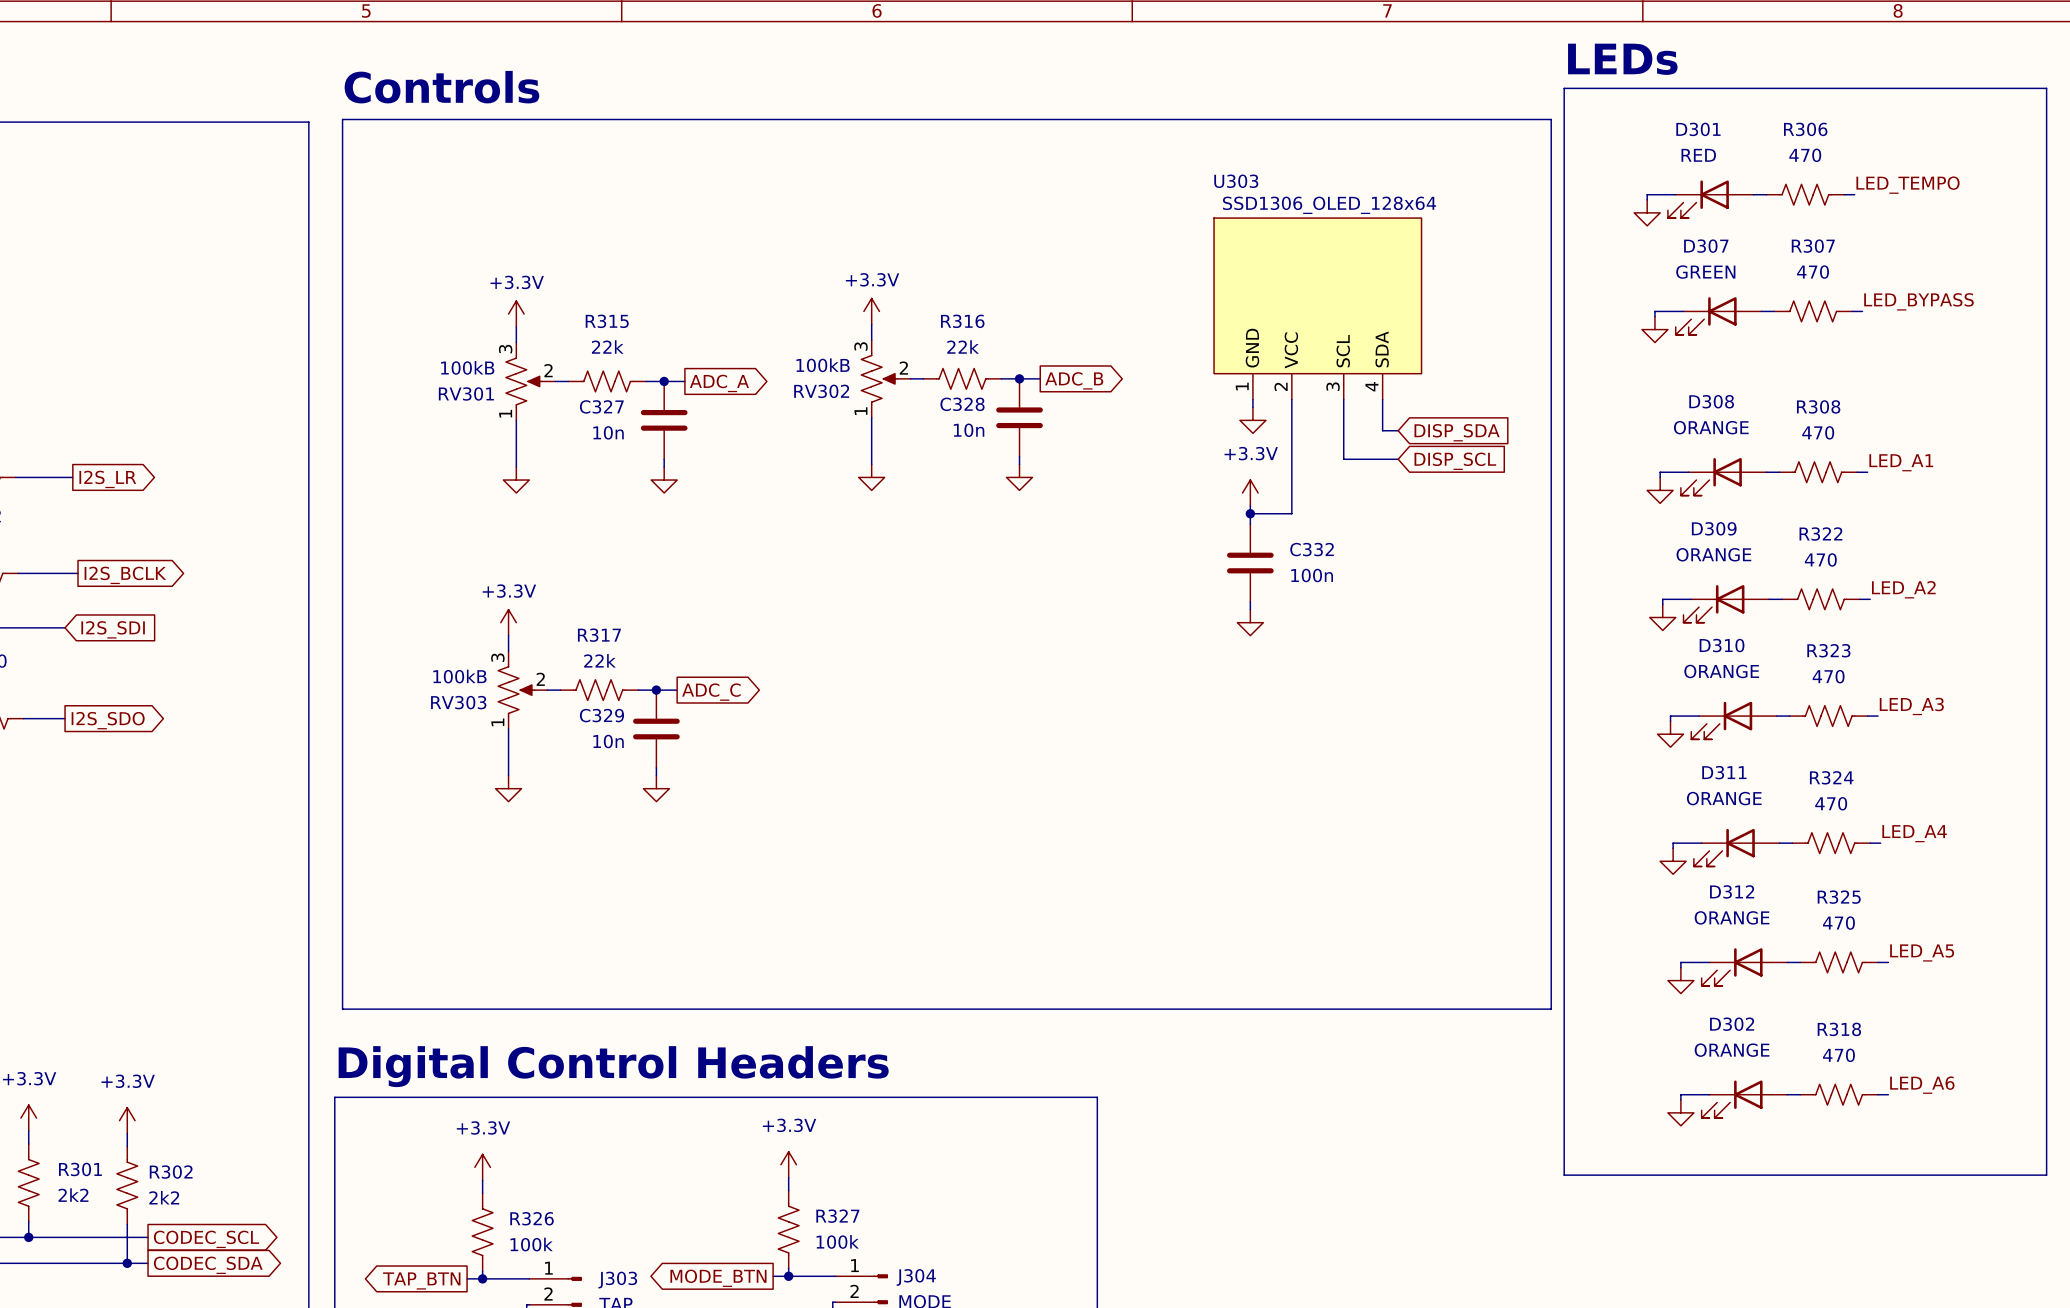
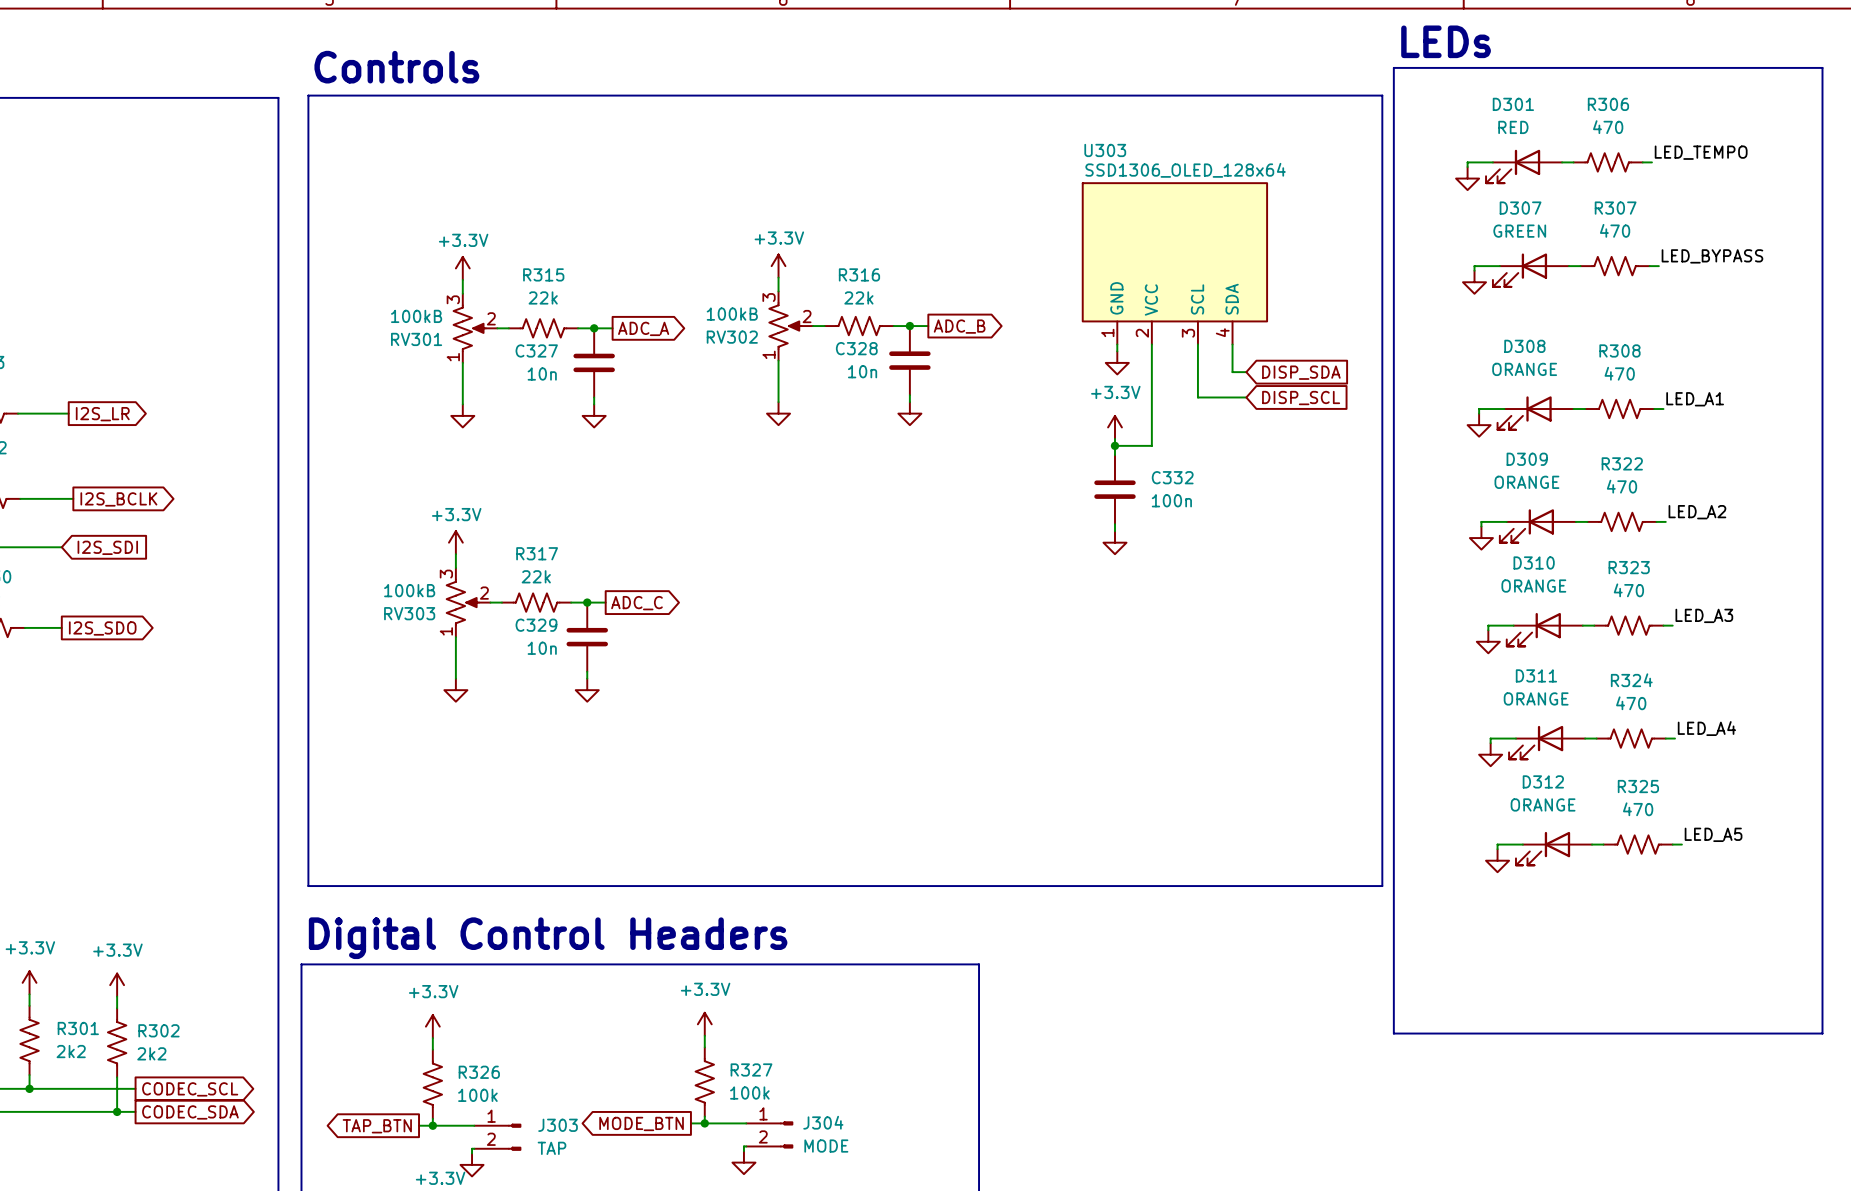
label: LED_A6 (1922, 1085) -> none
wire: (1709, 1094) (1680, 1094) (1680, 1099) -> none
wire: (1787, 1094) (1800, 1094) -> none
R318: 470 (1839, 1094) -> none
wire: (1878, 1094) (1888, 1094) -> none
D302: ORANGE (1744, 1099) -> none
power symbol: (1680, 1112) -> none

